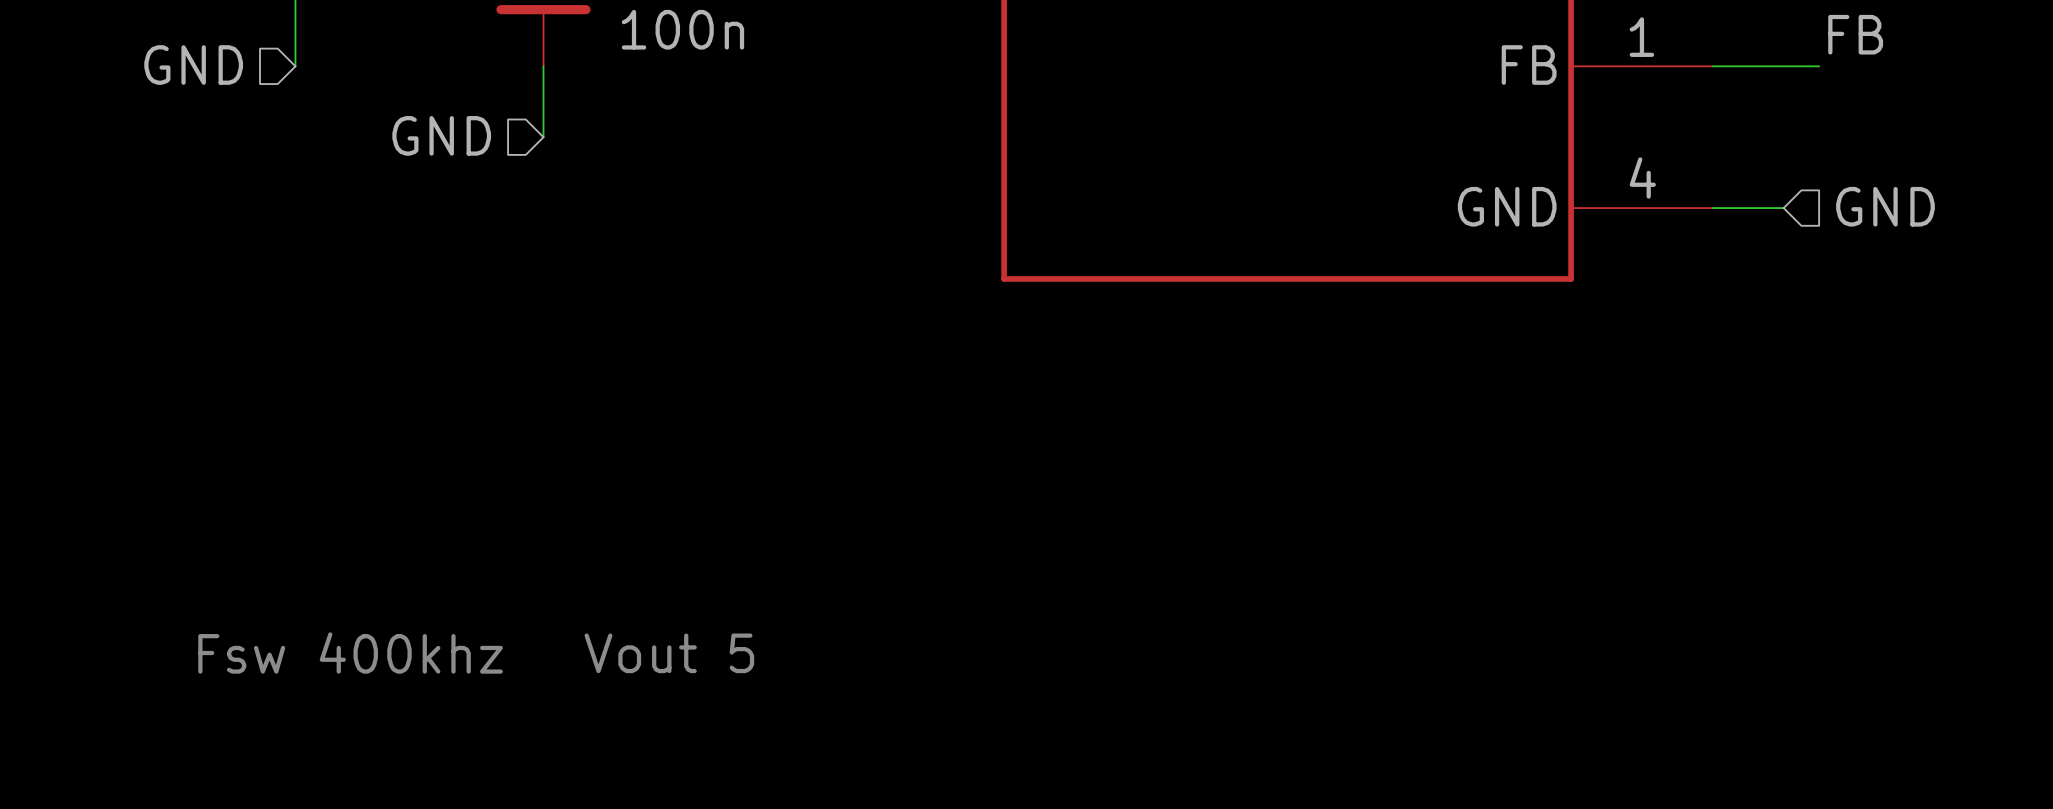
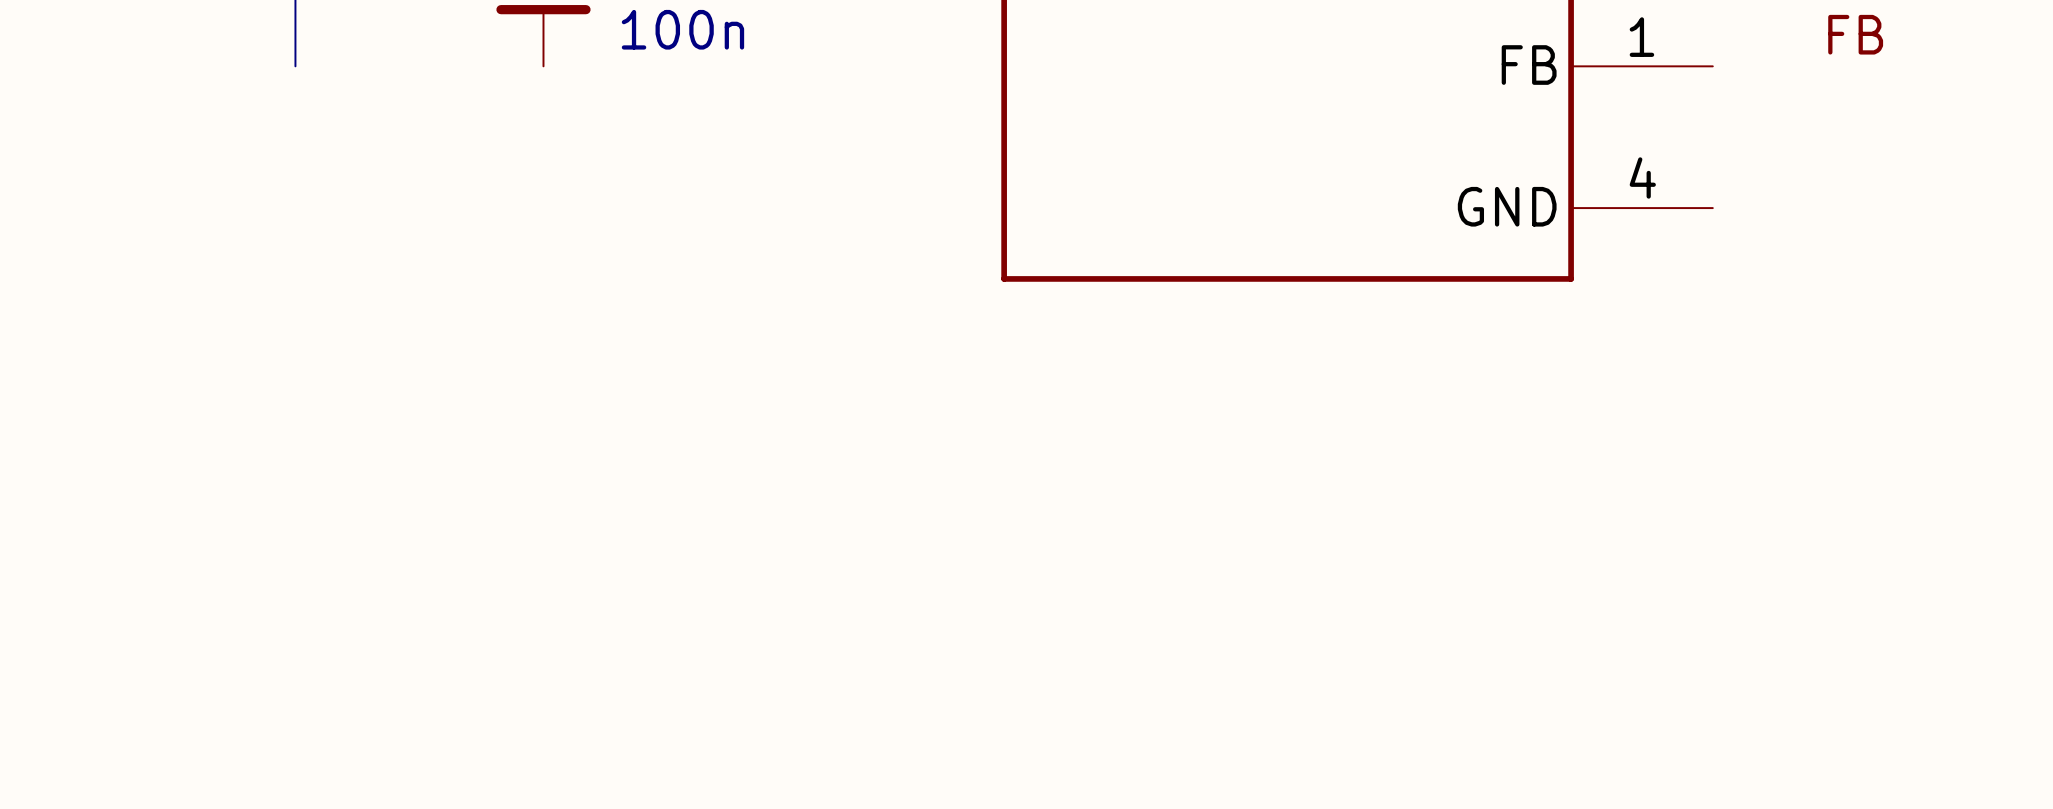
hierarchical label: GND (193, 65) -> none
wire: (543, 66) (543, 137) -> none
wire: (1712, 66) (1819, 66) -> none
hierarchical label: GND (441, 135) -> none
hierarchical label: GND (1885, 206) -> none
wire: (1712, 208) (1783, 208) -> none
text: Fsw 400khz (350, 653) -> none
text: Vout 5 (669, 653) -> none

